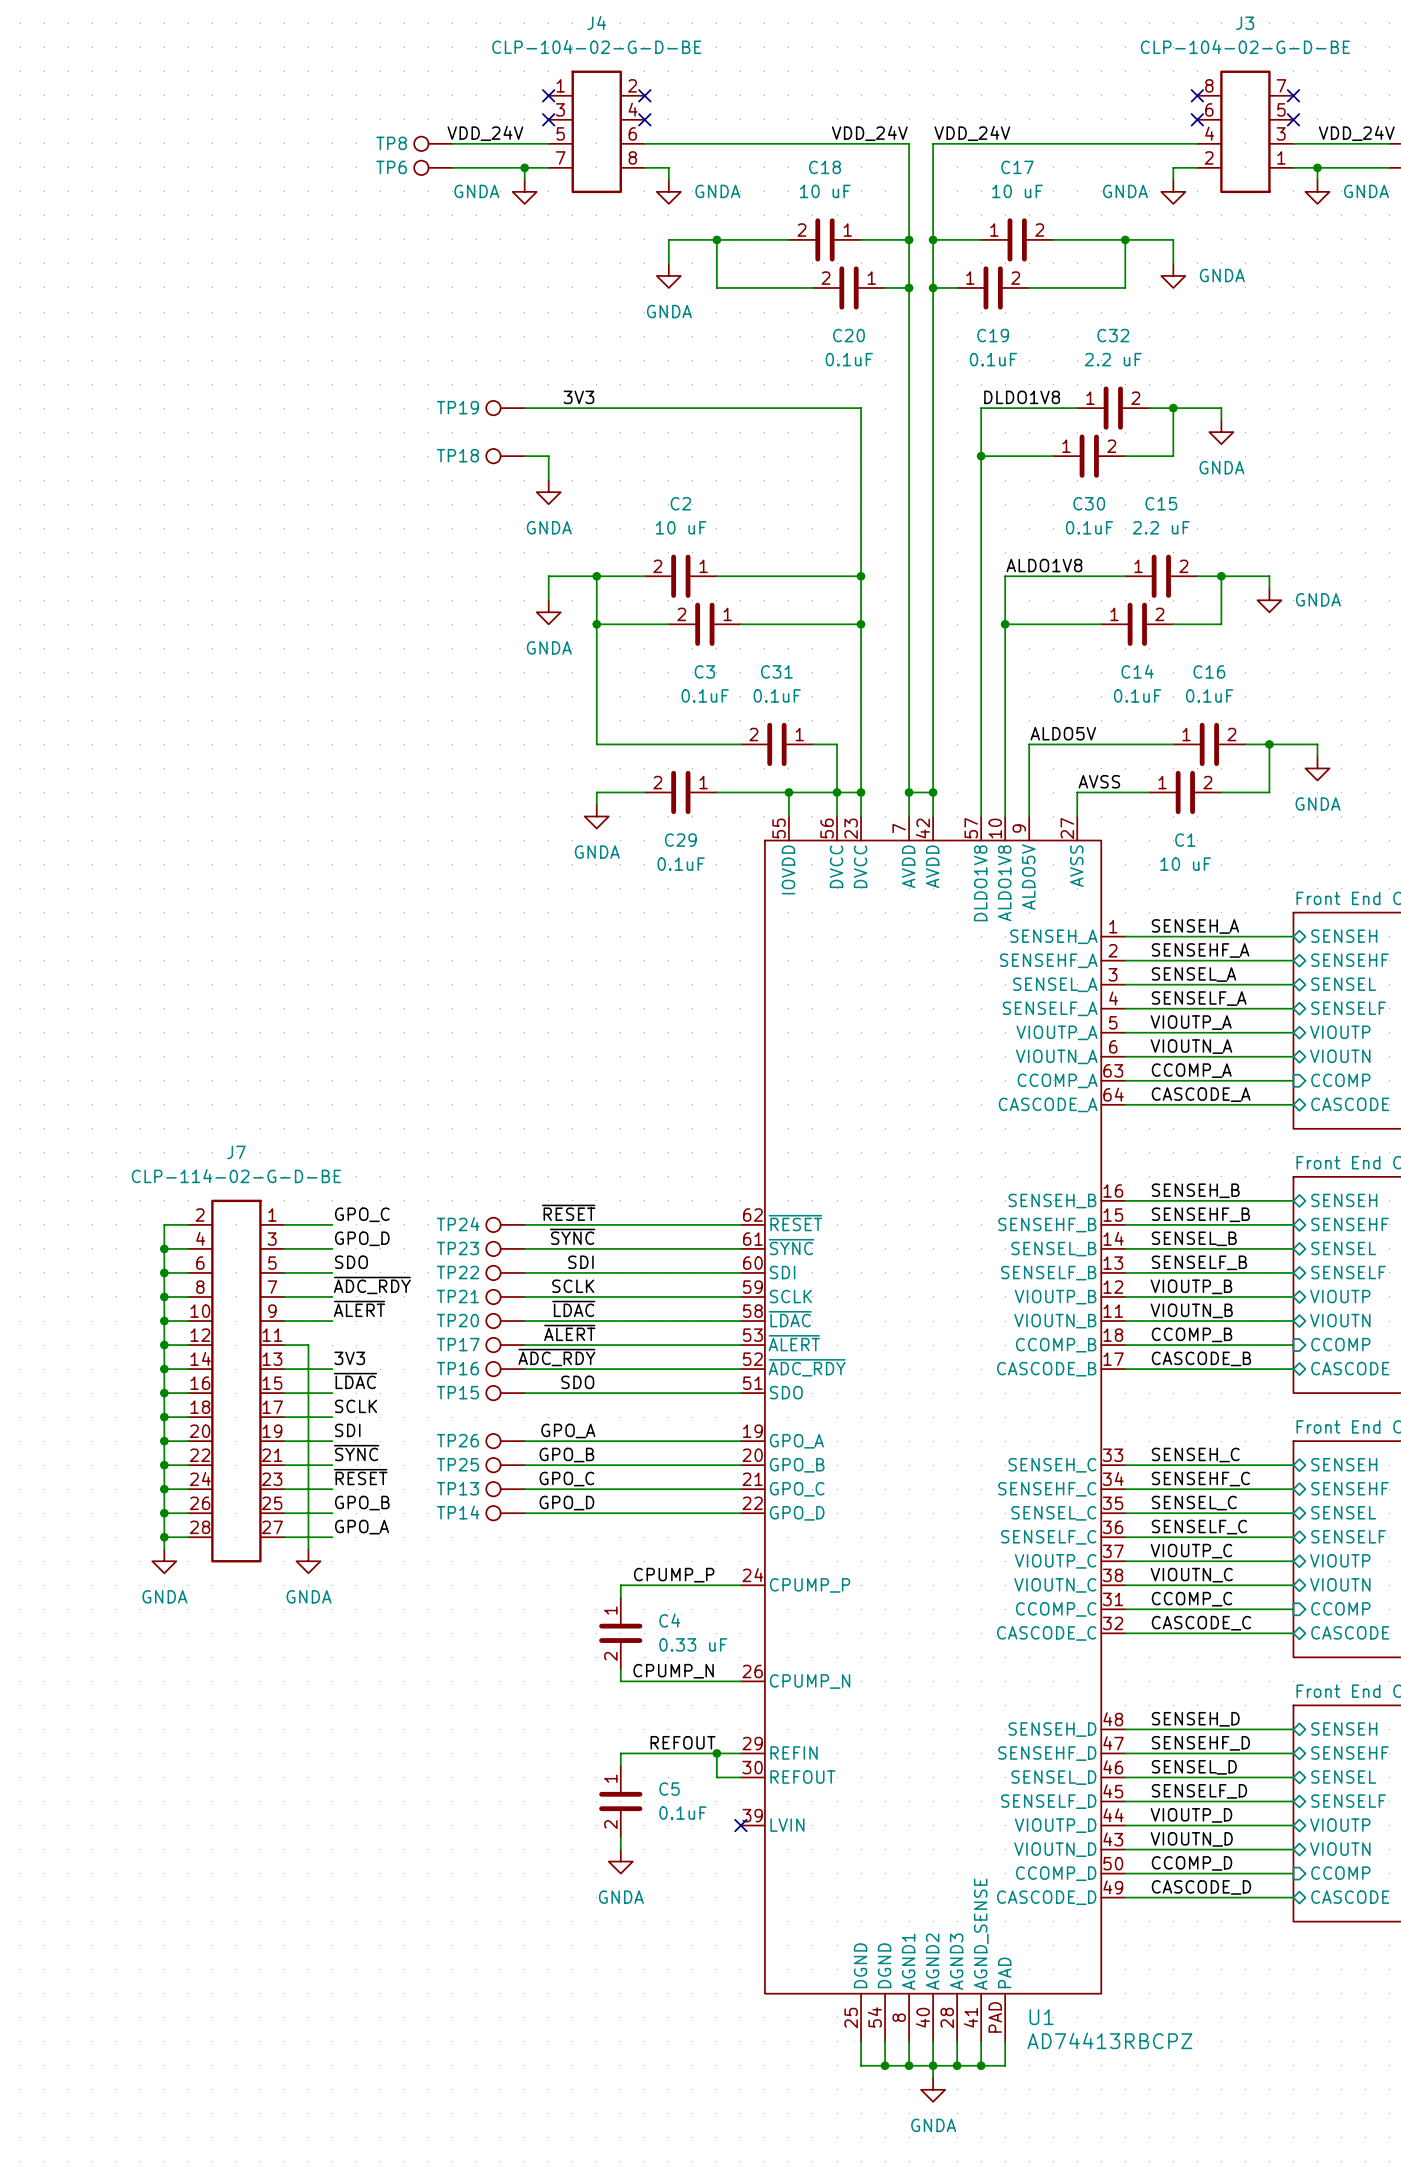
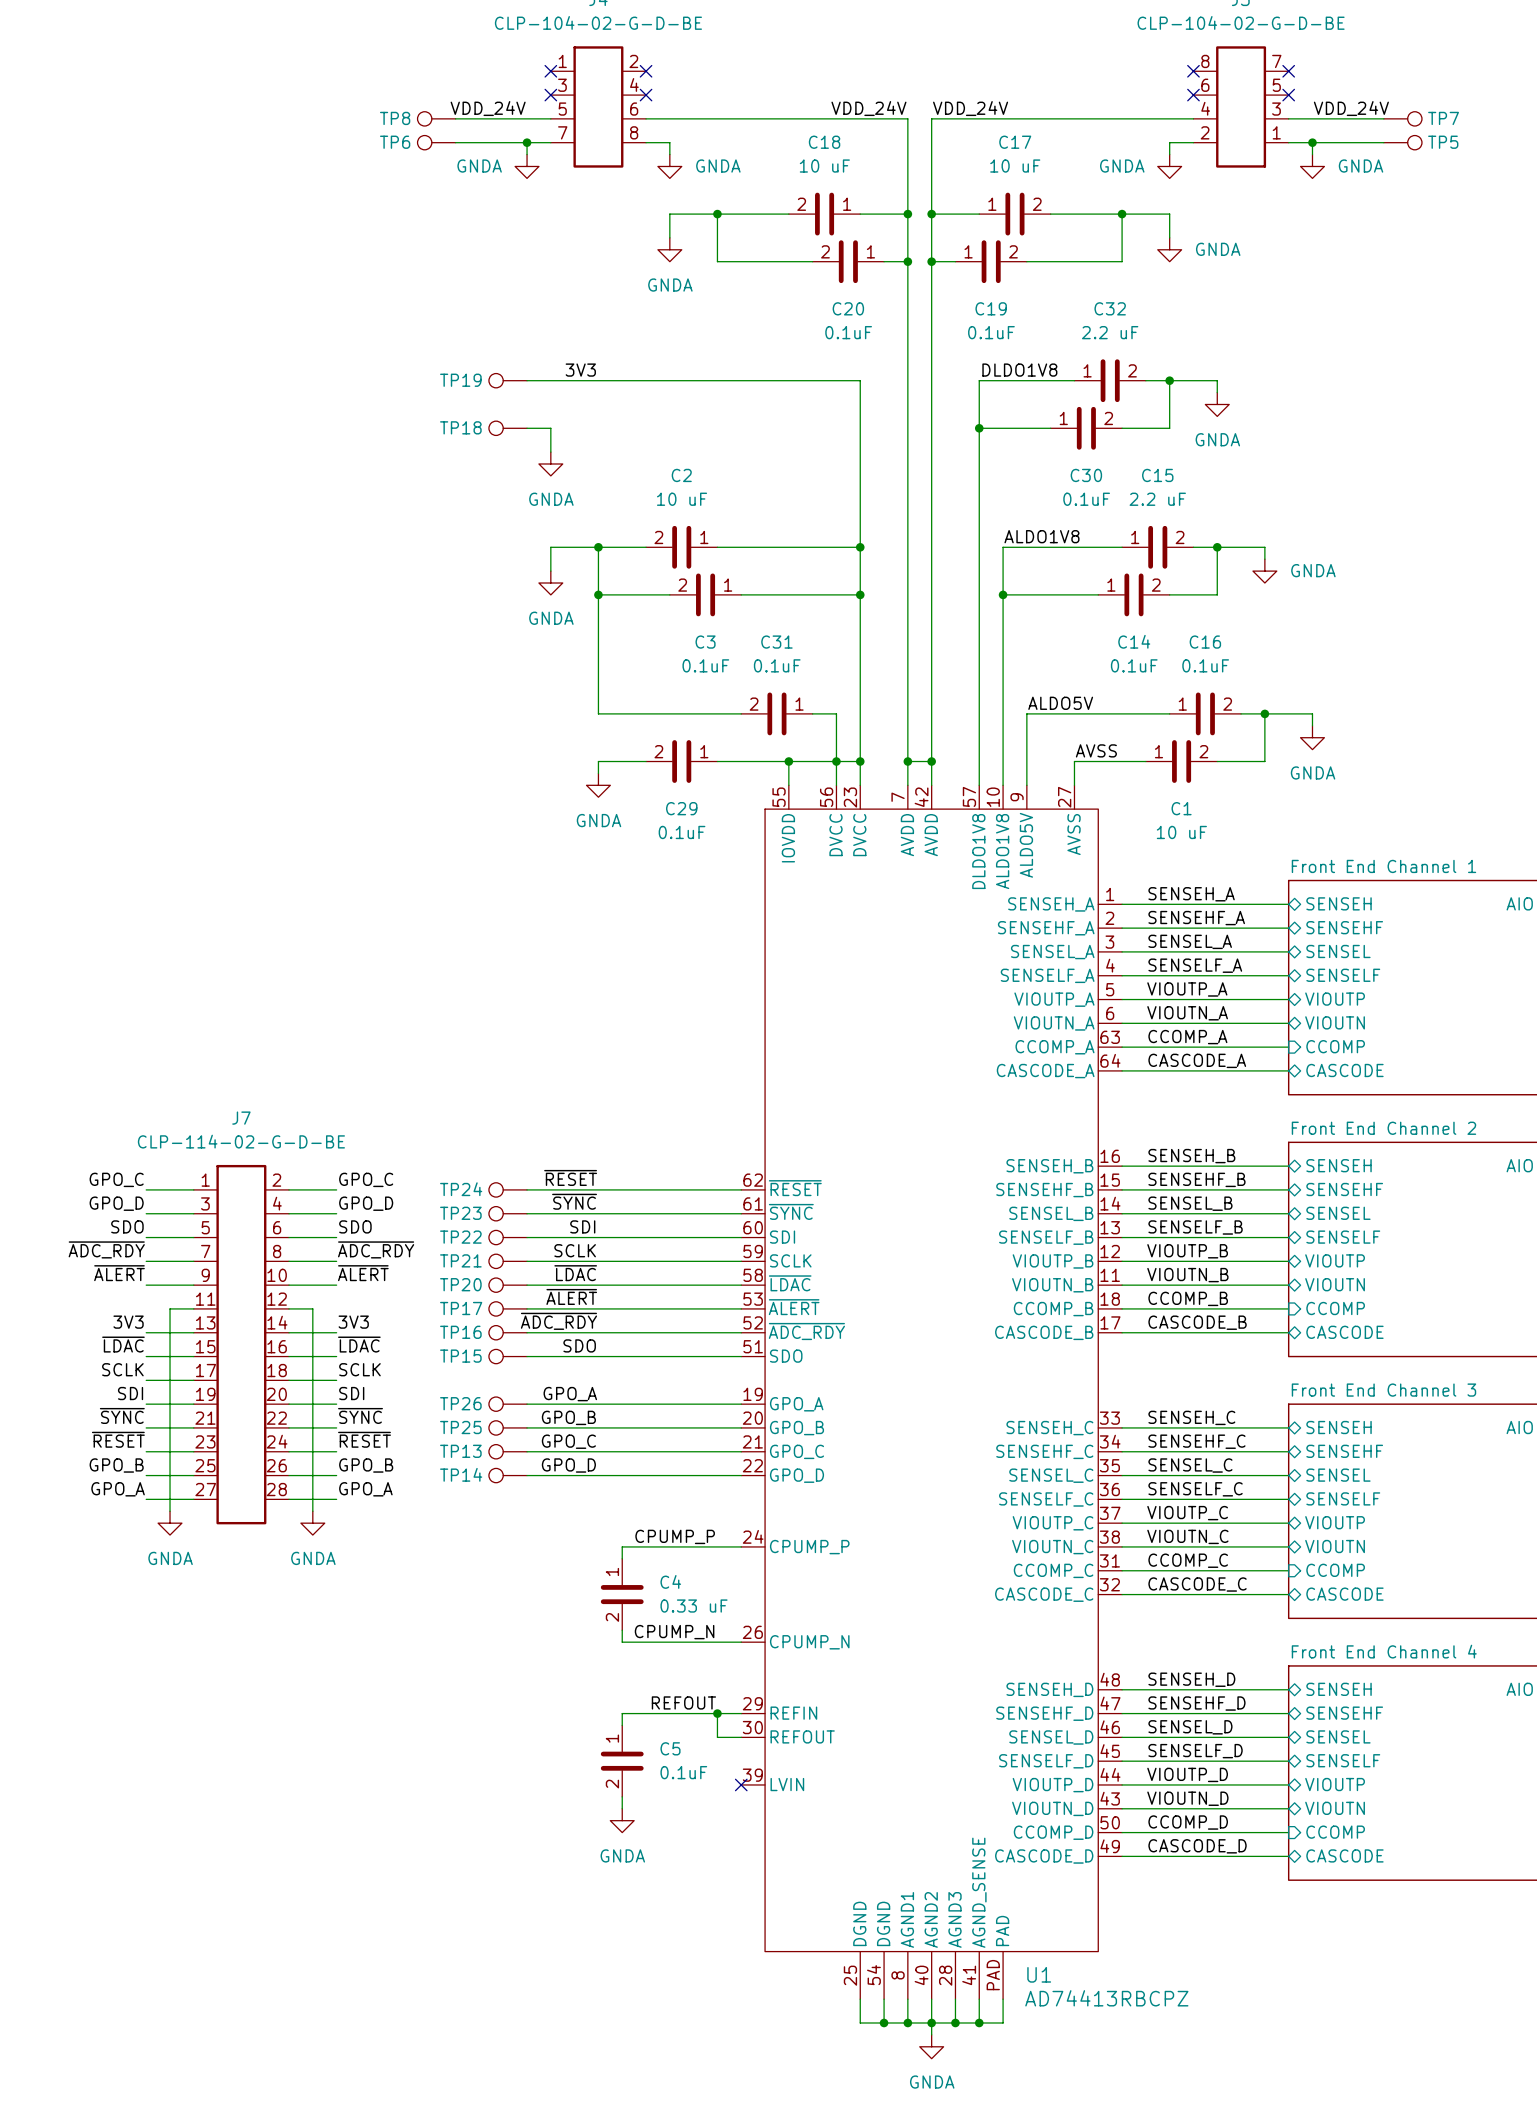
label: none -> GPO_C (116, 1179)
wire: (164, 1224) (164, 1345) -> (170, 1189) (146, 1189)
label: none -> GPO_D (116, 1203)
wire: none -> (146, 1213) (170, 1213)
junction: (164, 1248) -> none
label: none -> SDO (127, 1226)
wire: none -> (146, 1237) (170, 1237)
junction: (164, 1272) -> none
label: none -> ~{ADC_RDY} (106, 1249)
wire: none -> (146, 1261) (170, 1261)
junction: (164, 1296) -> none
label: none -> ~{ALERT} (119, 1273)
wire: none -> (146, 1285) (170, 1285)
junction: (164, 1321) -> none
junction: (164, 1345) -> none
label: none -> 3V3 (128, 1322)
wire: none -> (146, 1332) (170, 1332)
junction: (164, 1369) -> none
label: none -> ~{LDAC} (123, 1344)
J7 flip: as is (236, 1381) -> left-right (241, 1344)
wire: none -> (146, 1356) (170, 1356)
junction: (164, 1393) -> none
label: none -> SCLK (122, 1369)
wire: none -> (146, 1380) (170, 1380)
junction: (164, 1417) -> none
label: none -> SDI (130, 1393)
wire: none -> (146, 1404) (170, 1404)
junction: (164, 1441) -> none
label: none -> ~{SYNC} (122, 1415)
wire: none -> (146, 1427) (170, 1427)
junction: (164, 1465) -> none
label: none -> ~{RESET} (118, 1439)
wire: none -> (146, 1451) (170, 1451)
junction: (164, 1489) -> none
label: none -> GPO_B (116, 1465)
wire: none -> (146, 1475) (170, 1475)
junction: (164, 1513) -> none
label: none -> GPO_A (118, 1489)
wire: none -> (146, 1499) (170, 1499)
junction: (164, 1537) -> none

